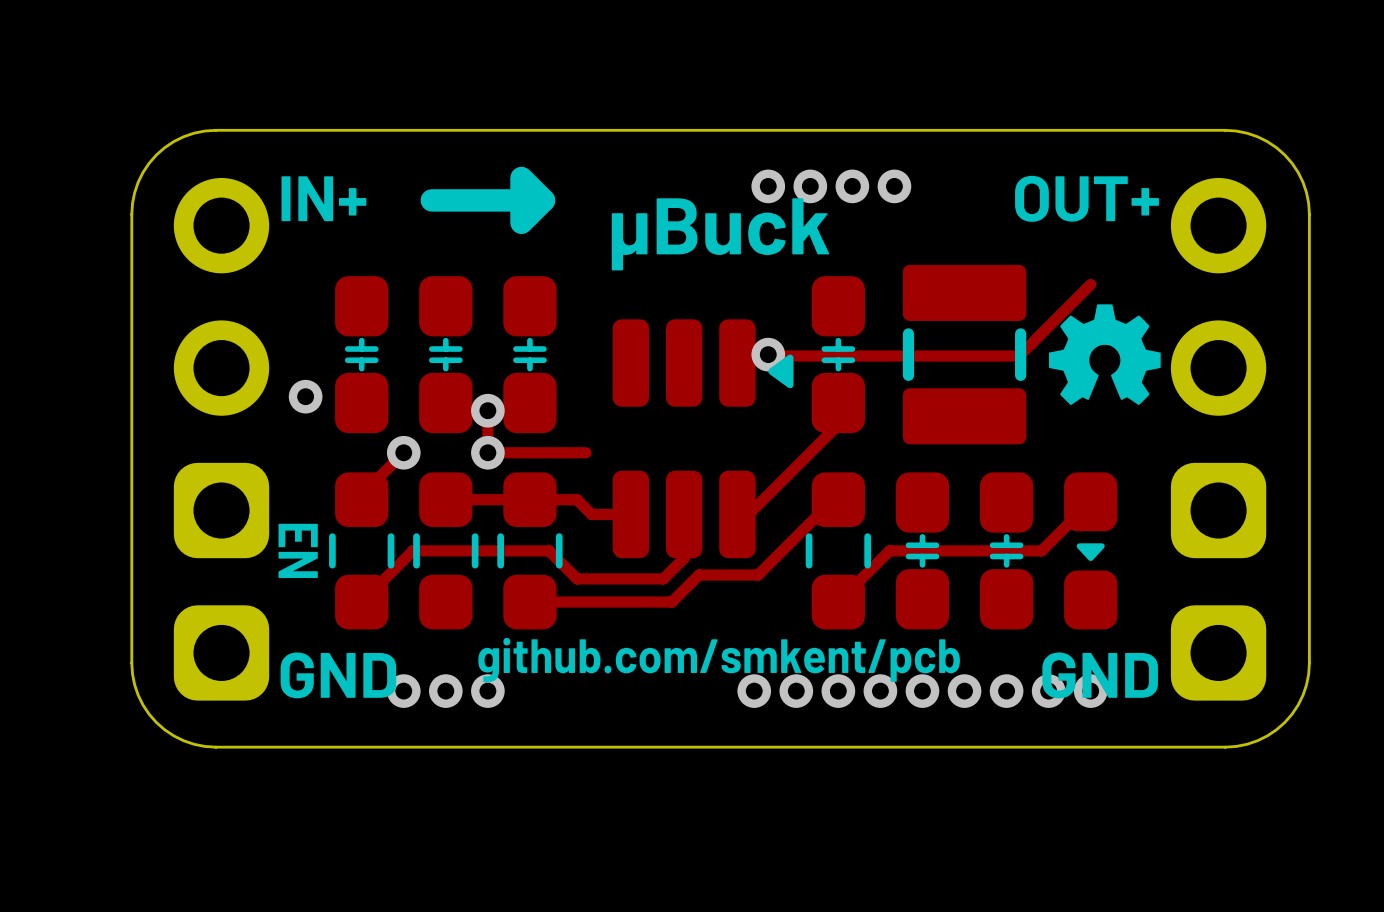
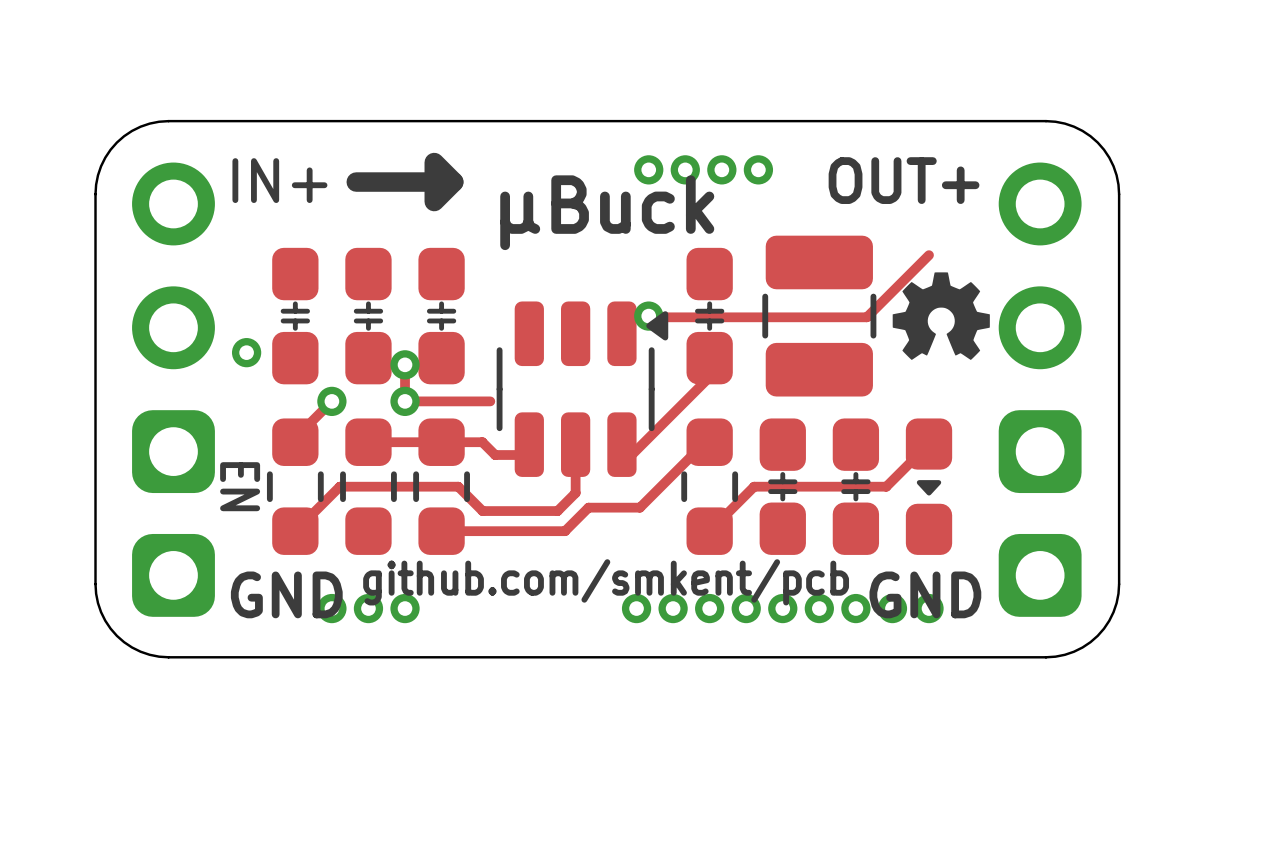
part footprint: [902, 264, 1027, 445] -> [762, 235, 877, 397]
part footprint: [612, 319, 794, 559] -> [496, 301, 669, 477]

